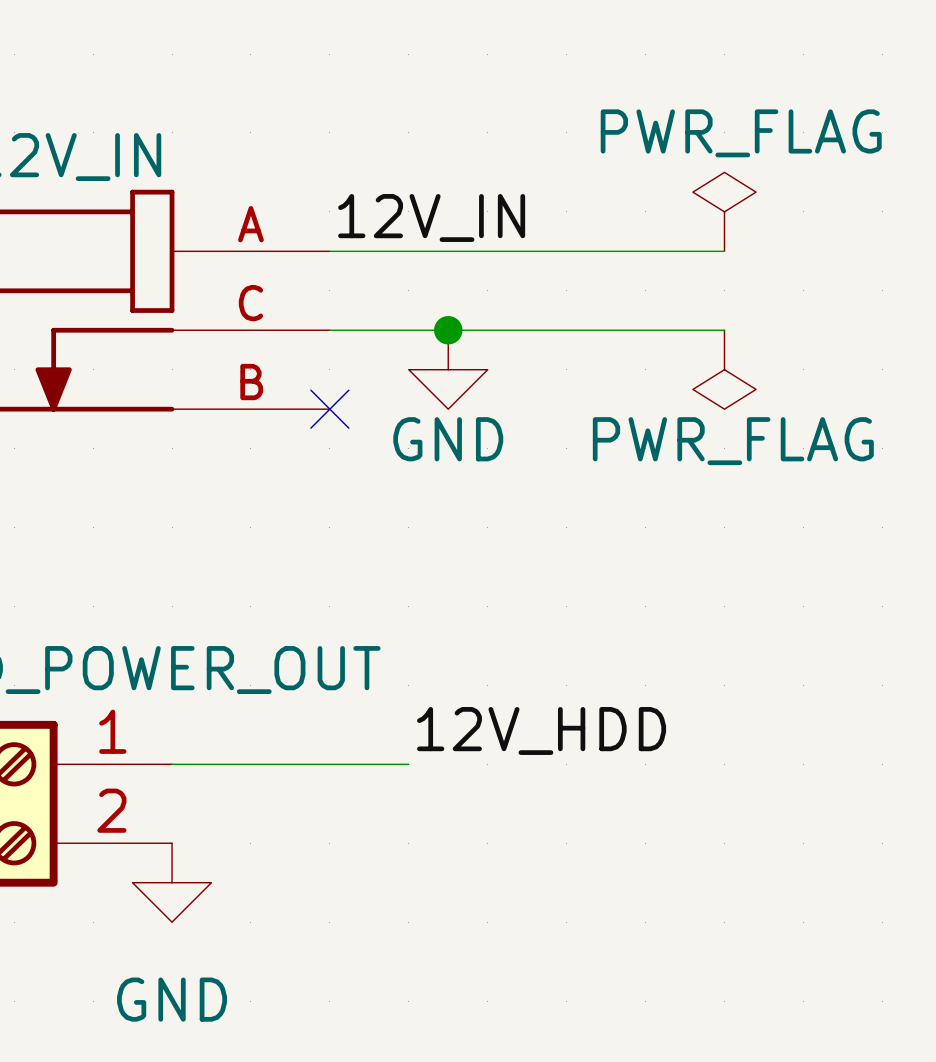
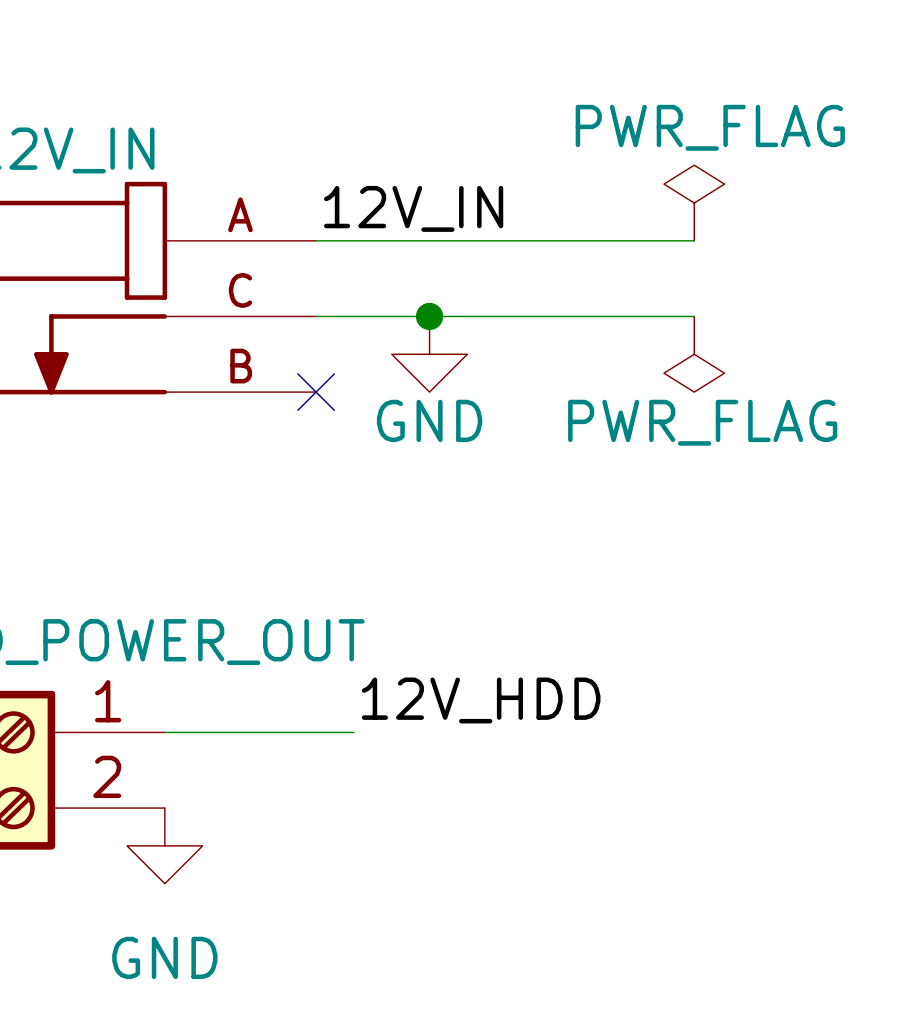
label position: 12V_HDD (541, 730) -> 12V_HDD (481, 700)
wire: (369, 764) (408, 764) -> none

